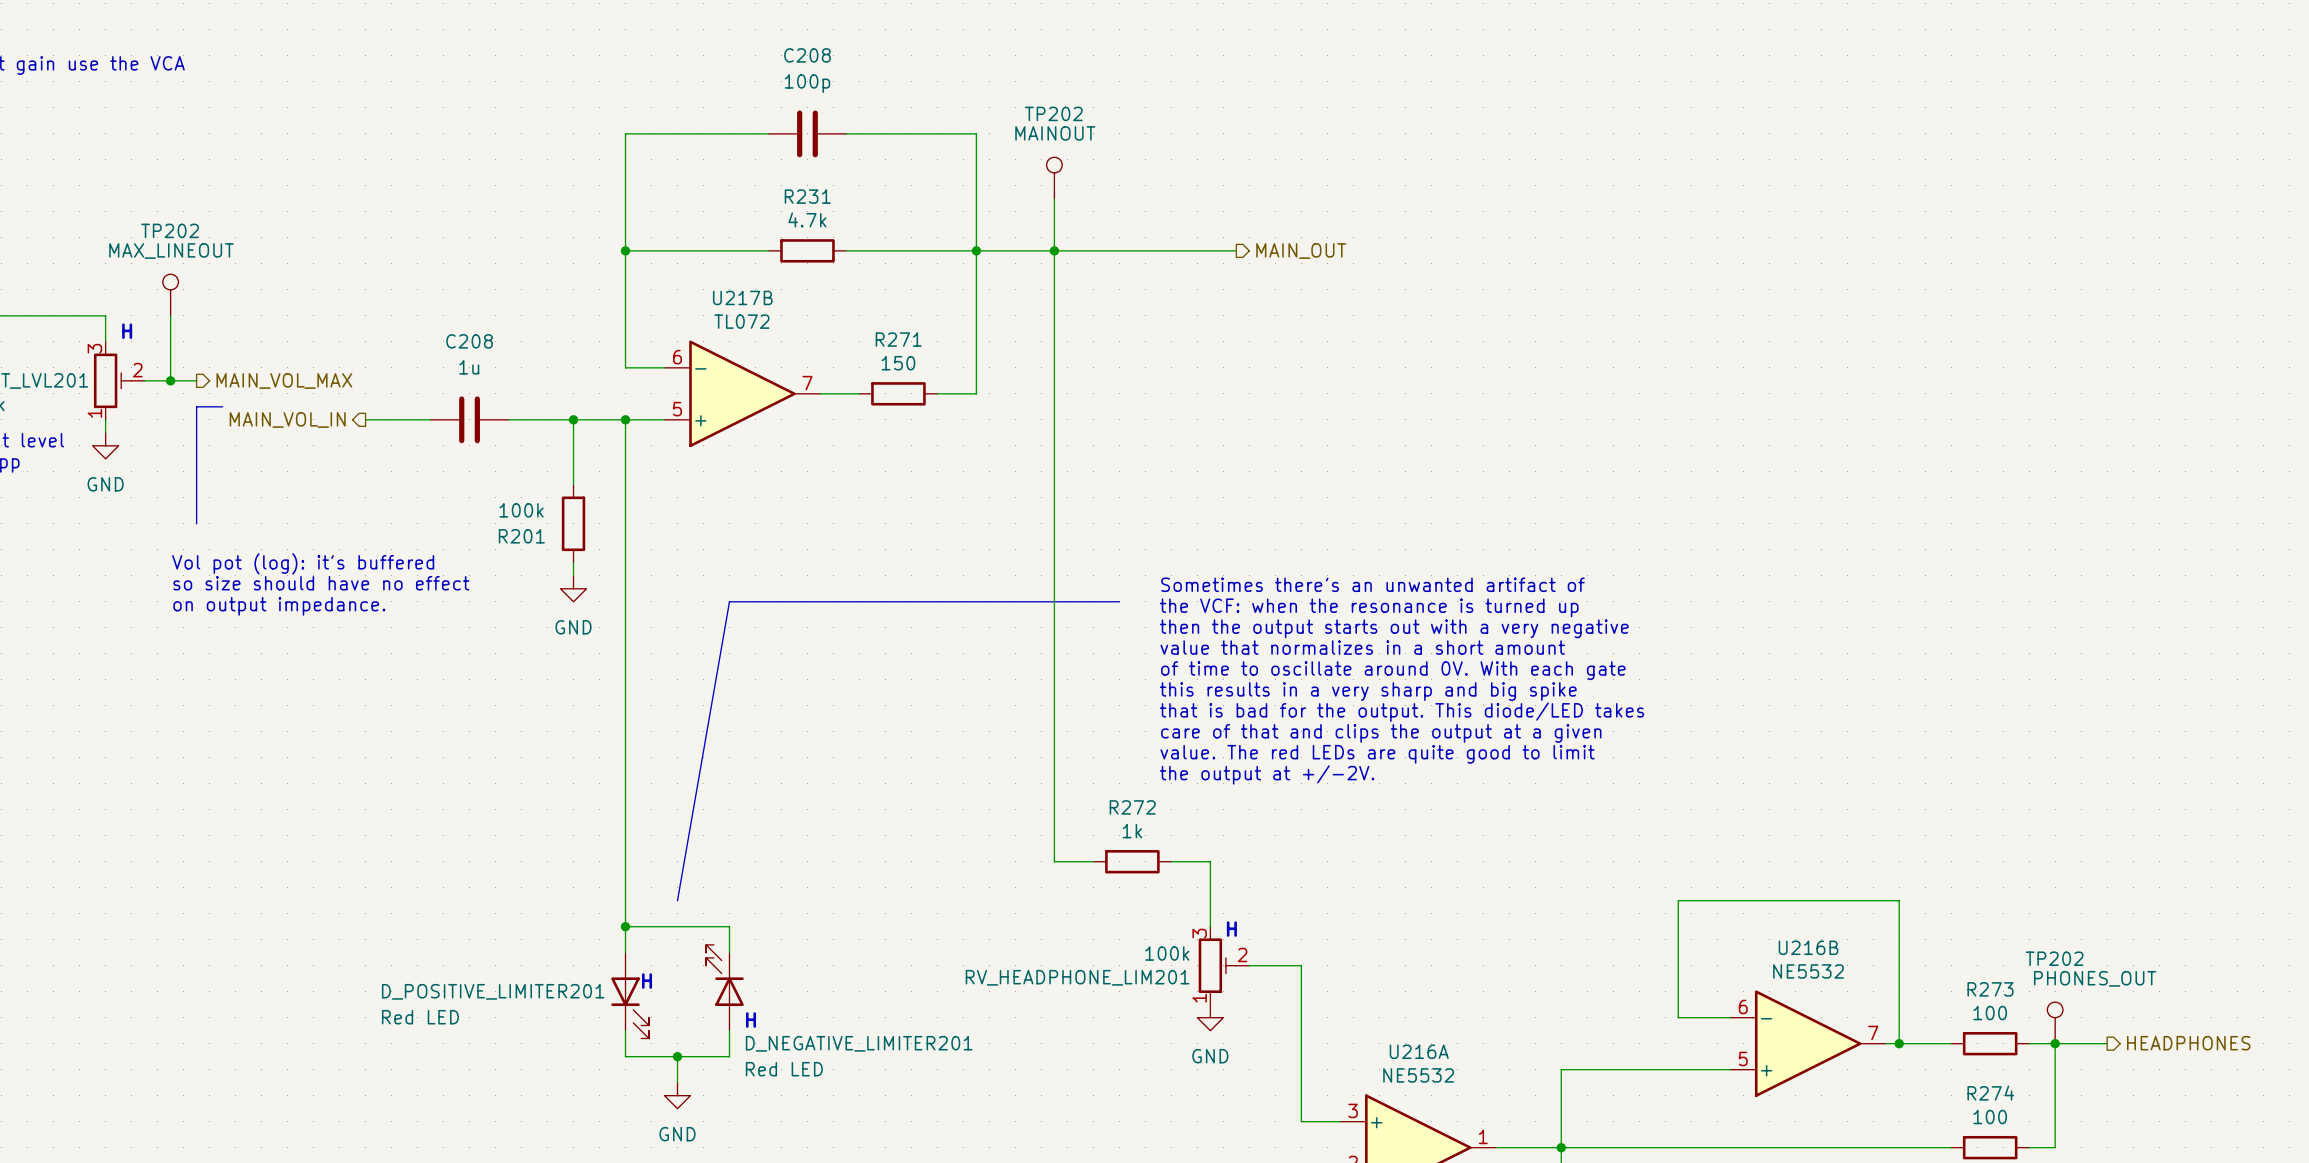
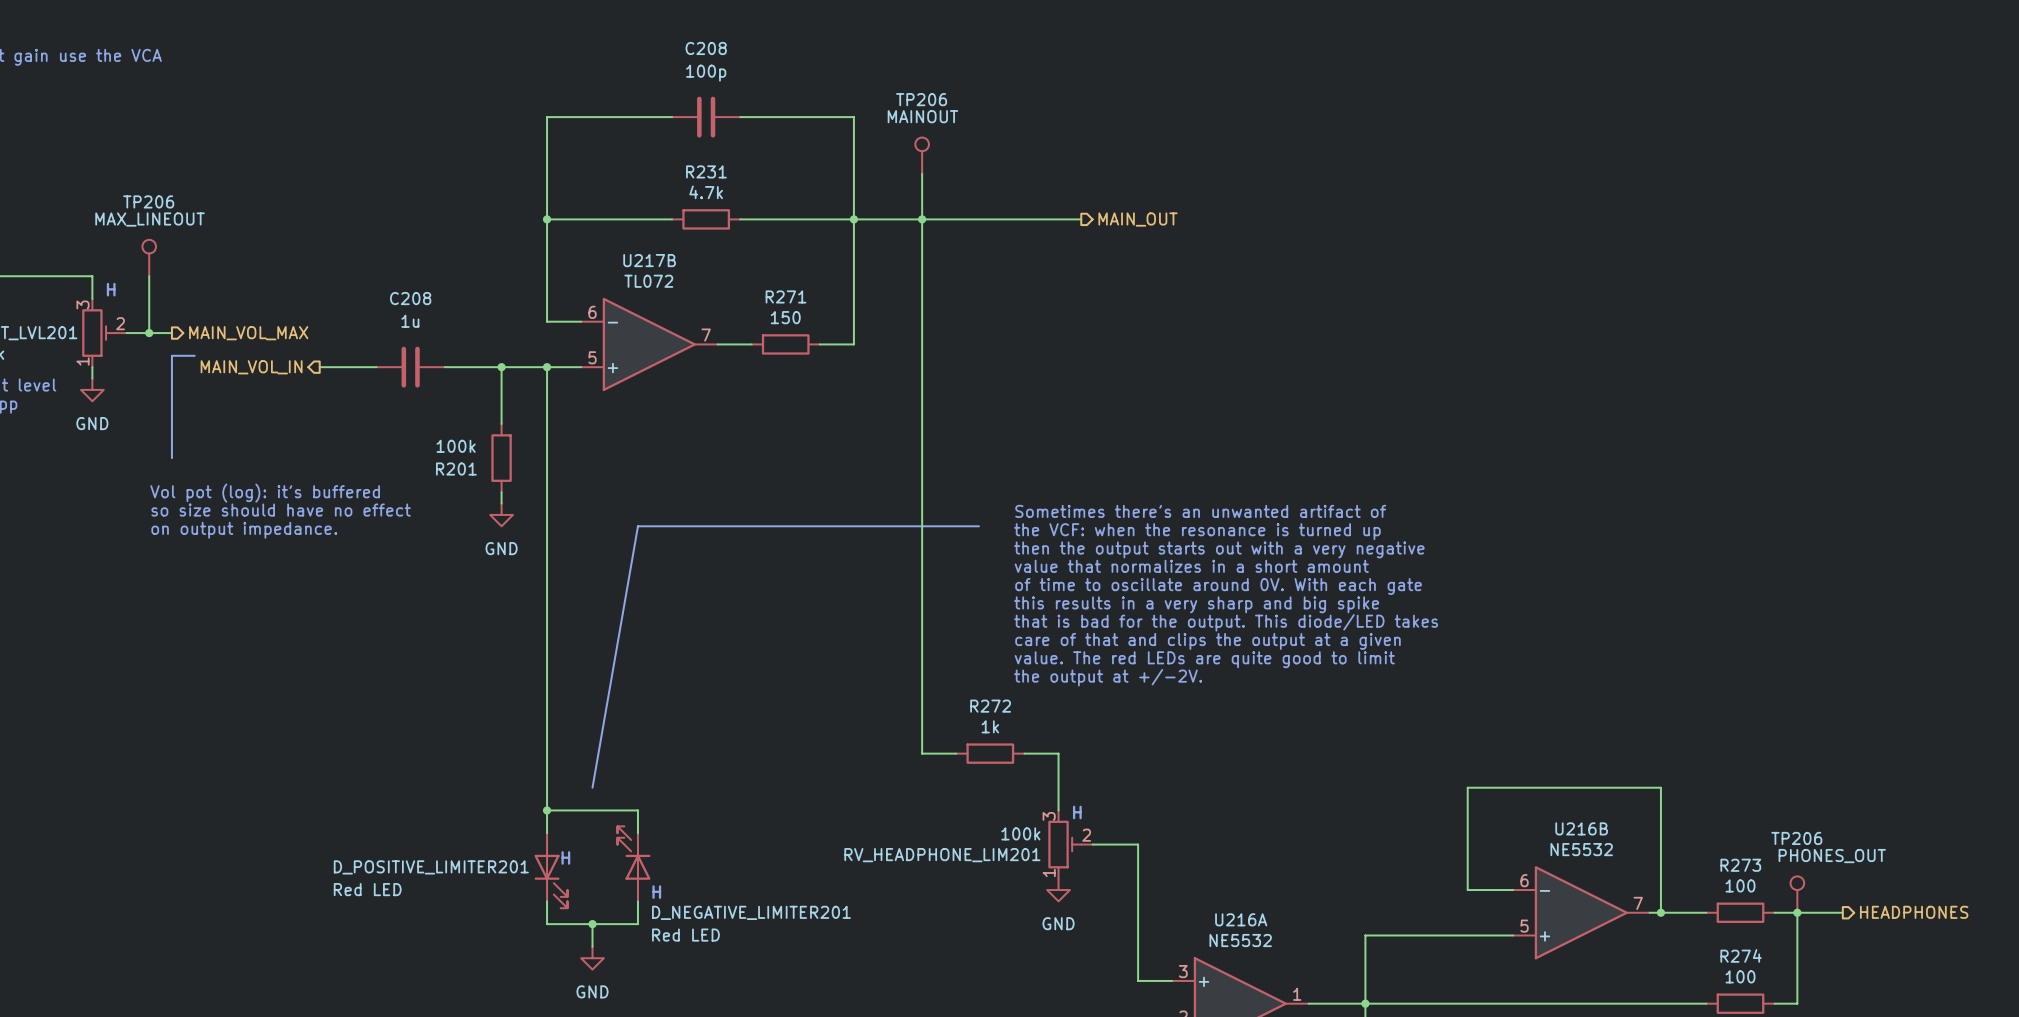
TP202 name: TP202 (1053, 113) -> TP206 (921, 99)
TP202 name: TP202 (170, 230) -> TP206 (148, 201)
TP202 name: TP202 (2054, 958) -> TP206 (1796, 838)

